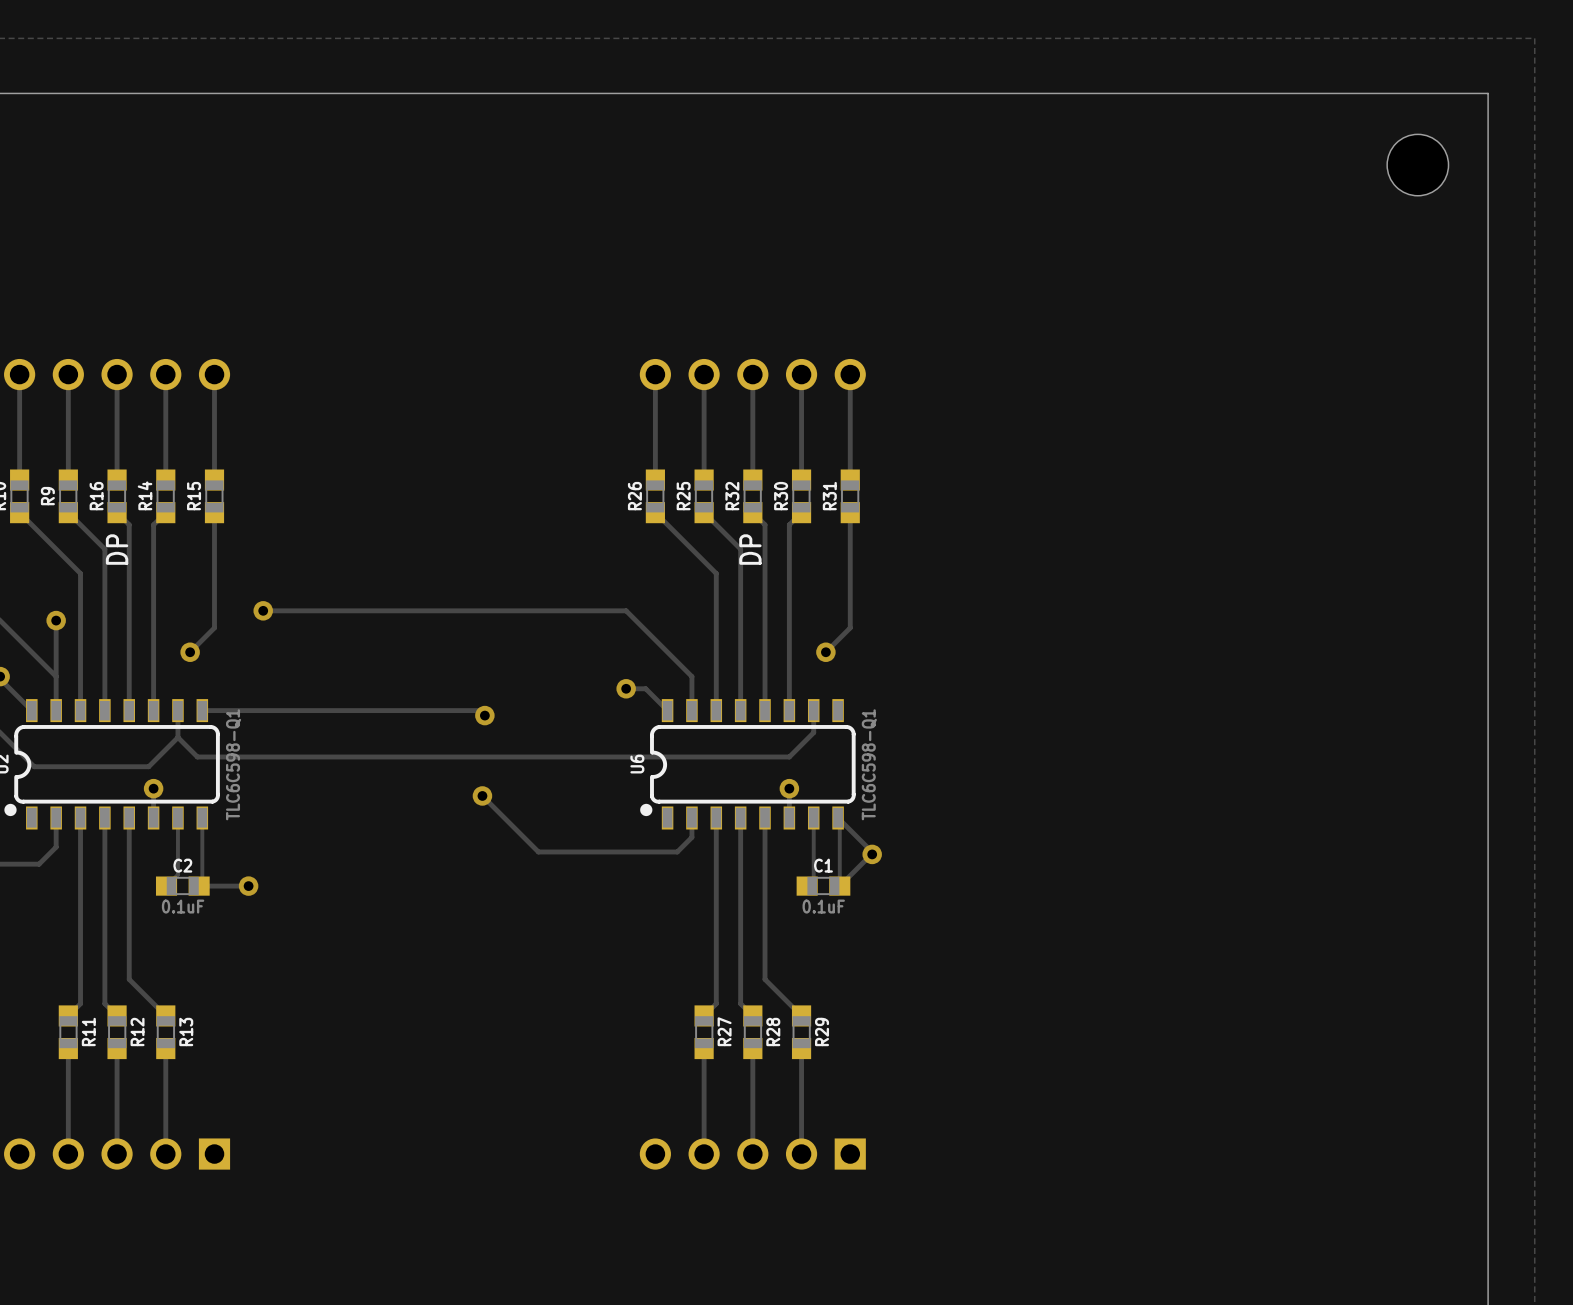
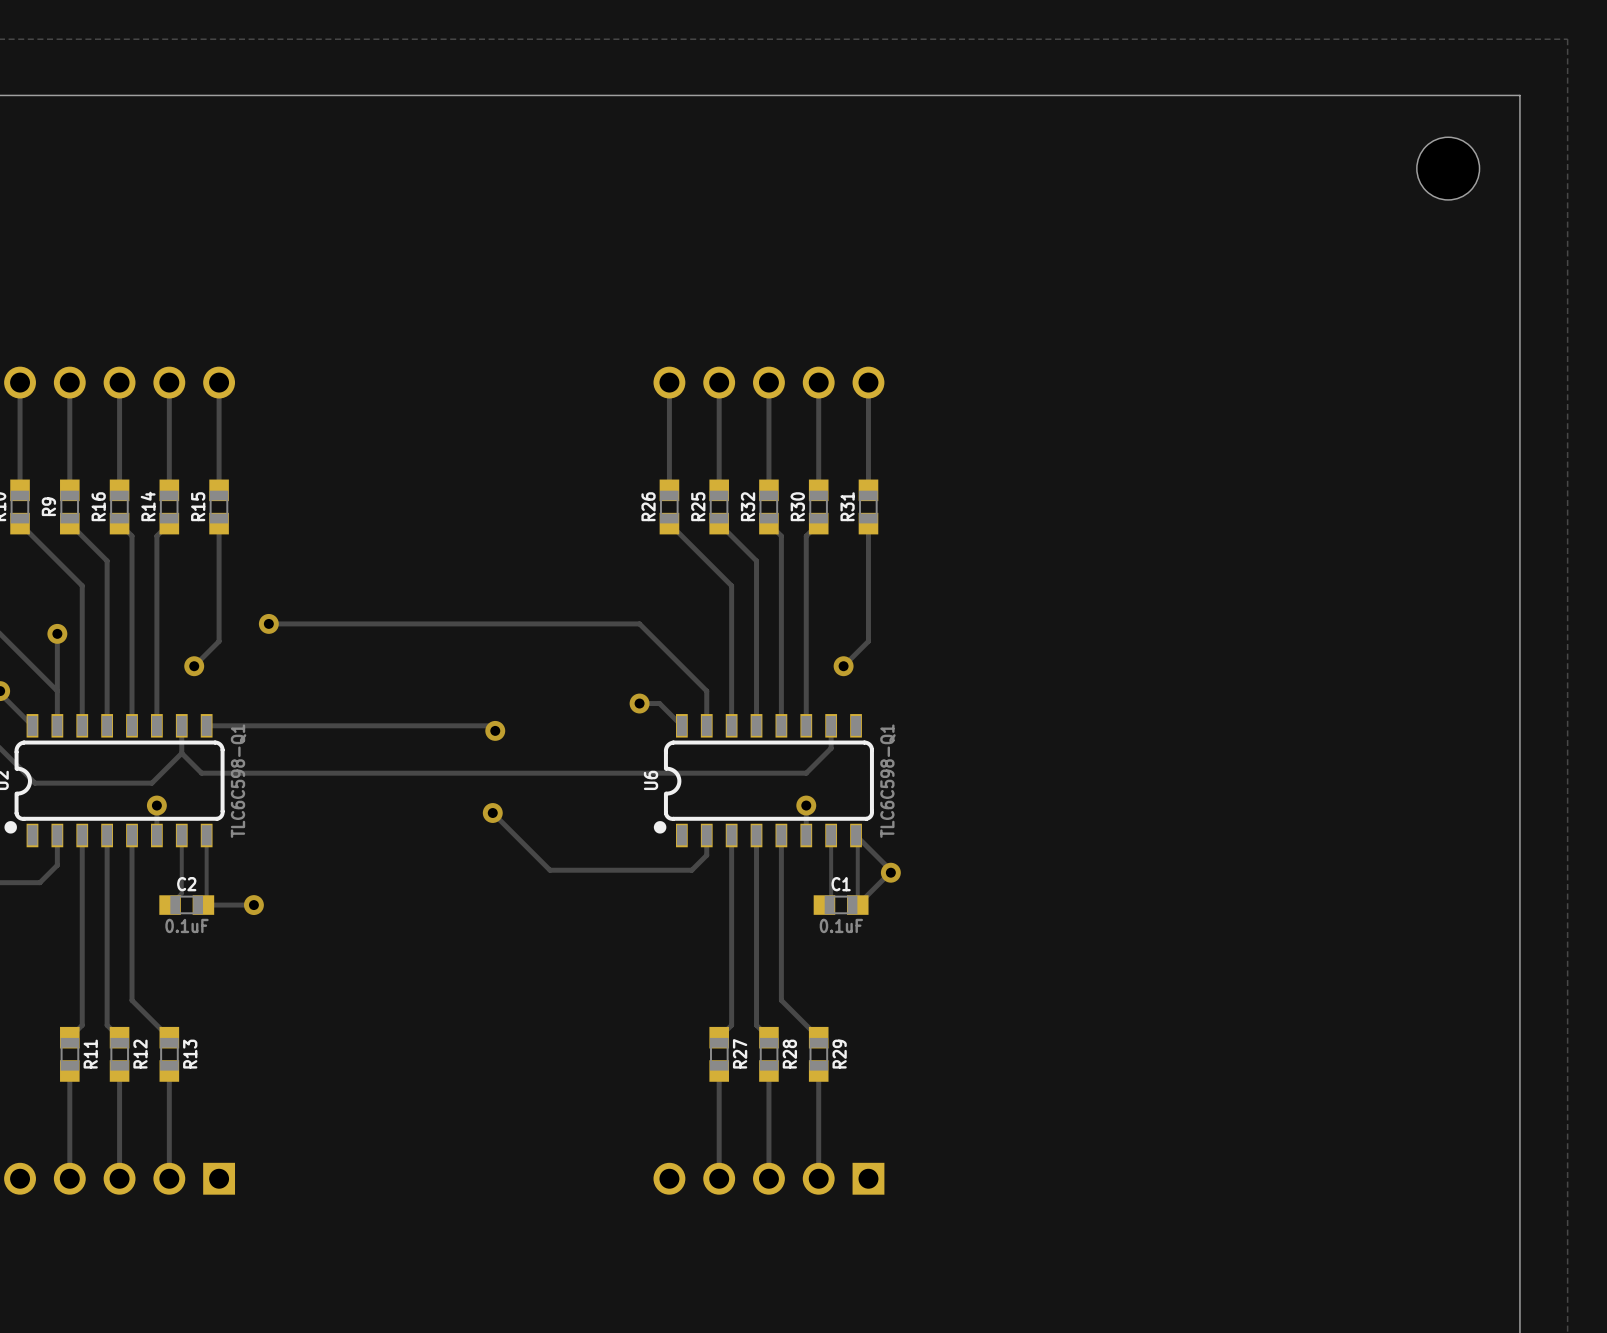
text: DP (117, 549) -> none
text: DP (750, 549) -> none

